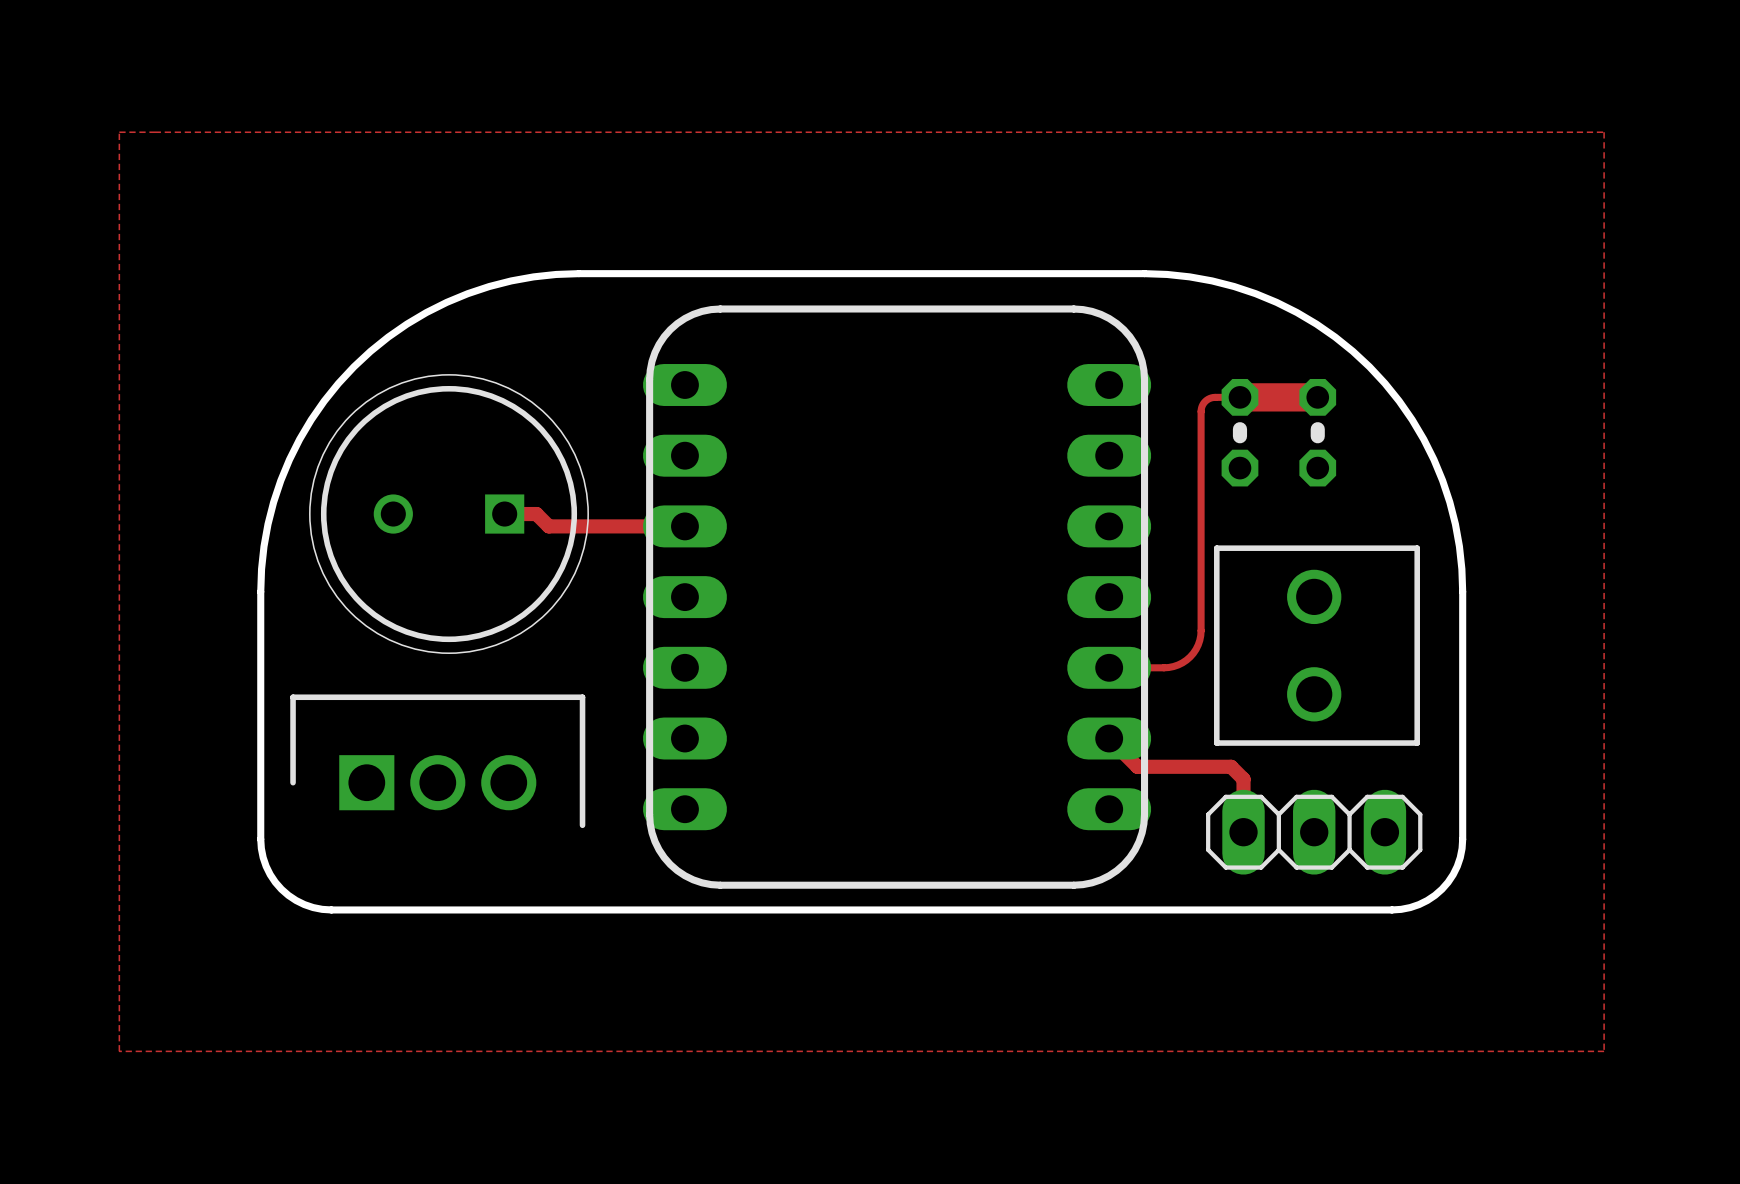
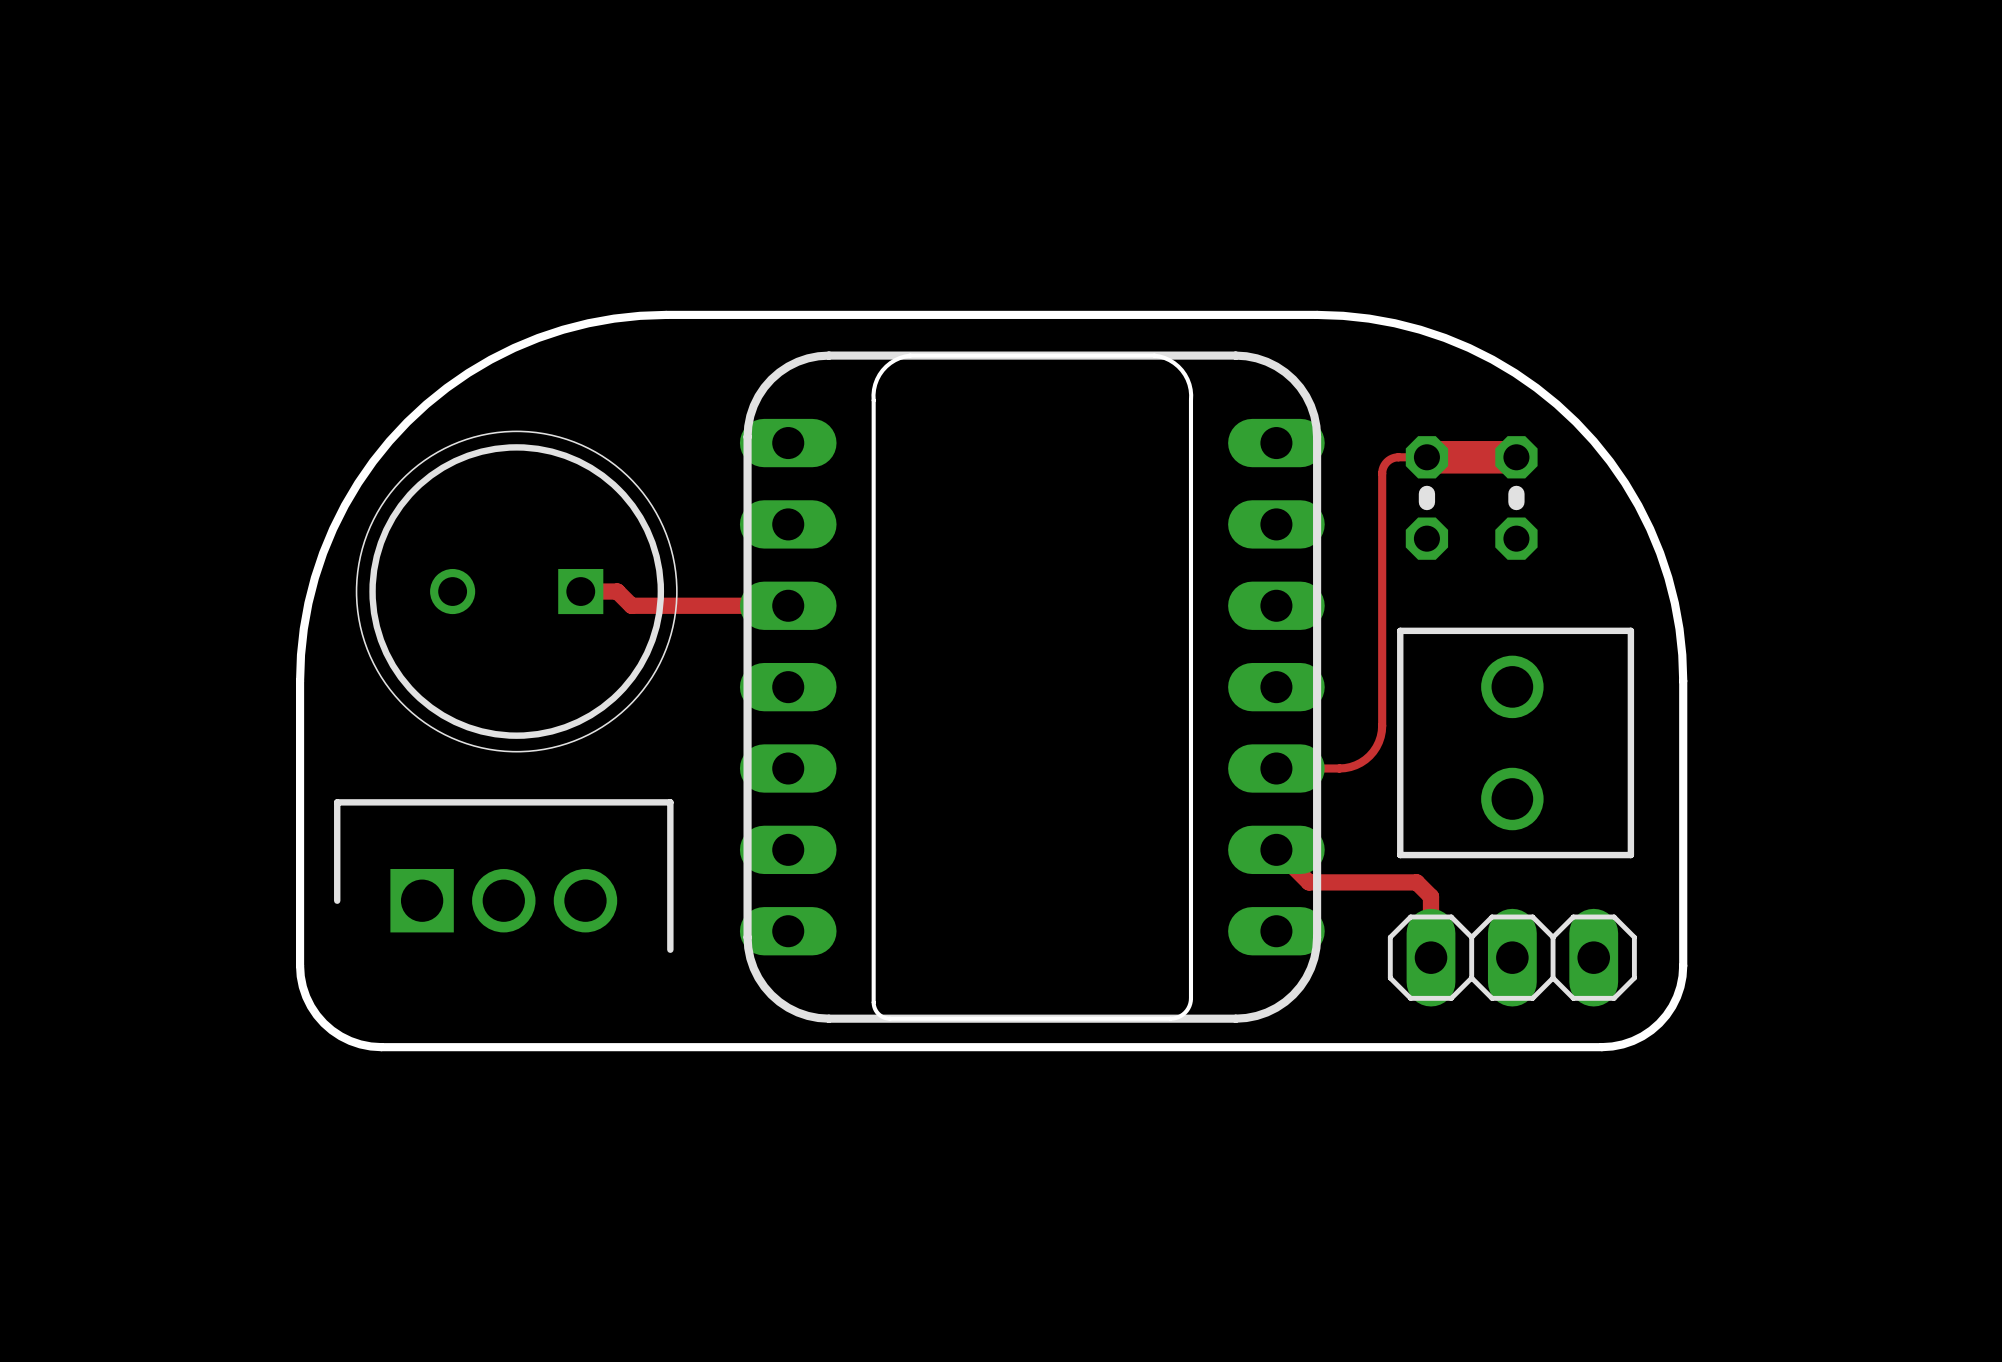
zone outline: (119, 132) (1604, 132) (1604, 1051) (119, 1051) (119, 132) -> none
board edge: none -> (910, 355) (1154, 355) (1174, 363) (1187, 379) (1191, 394) (1190, 998) (1186, 1010) (1178, 1017) (1170, 1018) (889, 1018) (880, 1015) (874, 1008) (873, 394) (877, 379) (886, 366) (899, 358) (910, 355)

